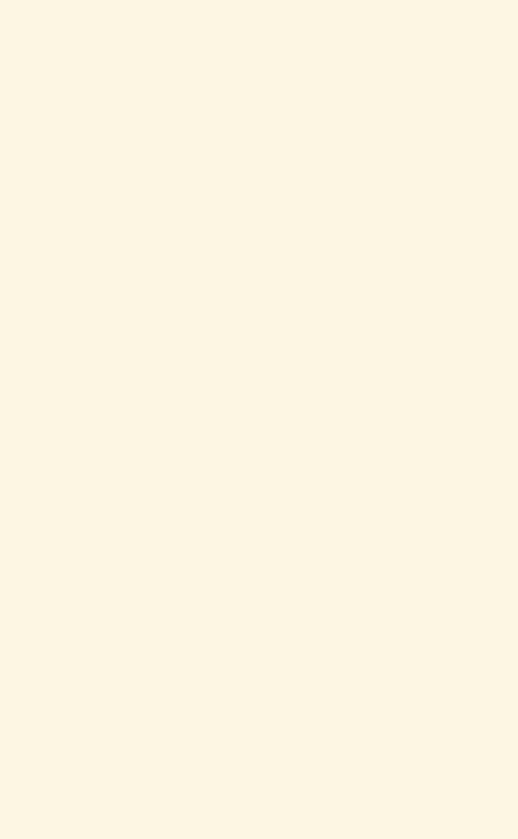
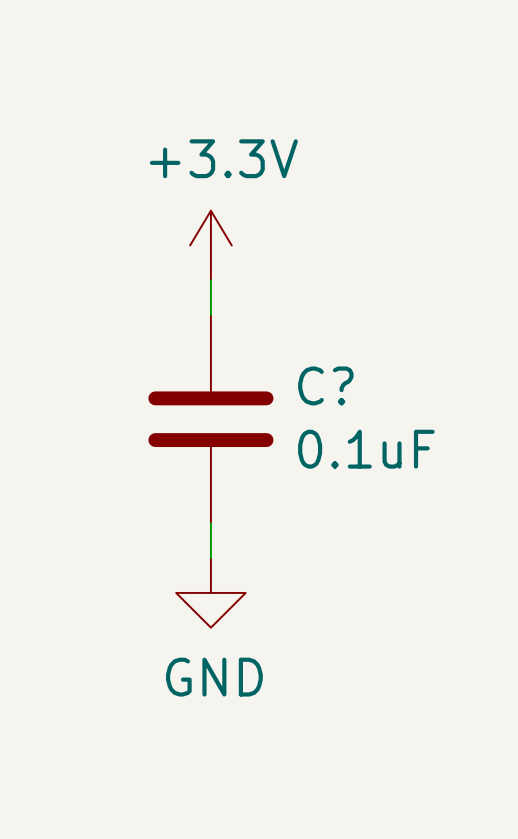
power symbol: none -> +3.3V (210, 245)
wire: none -> (210, 280) (210, 314)
C?: none -> 0.1uF (210, 419)
wire: none -> (210, 523) (210, 558)
power symbol: none -> GND (210, 592)

